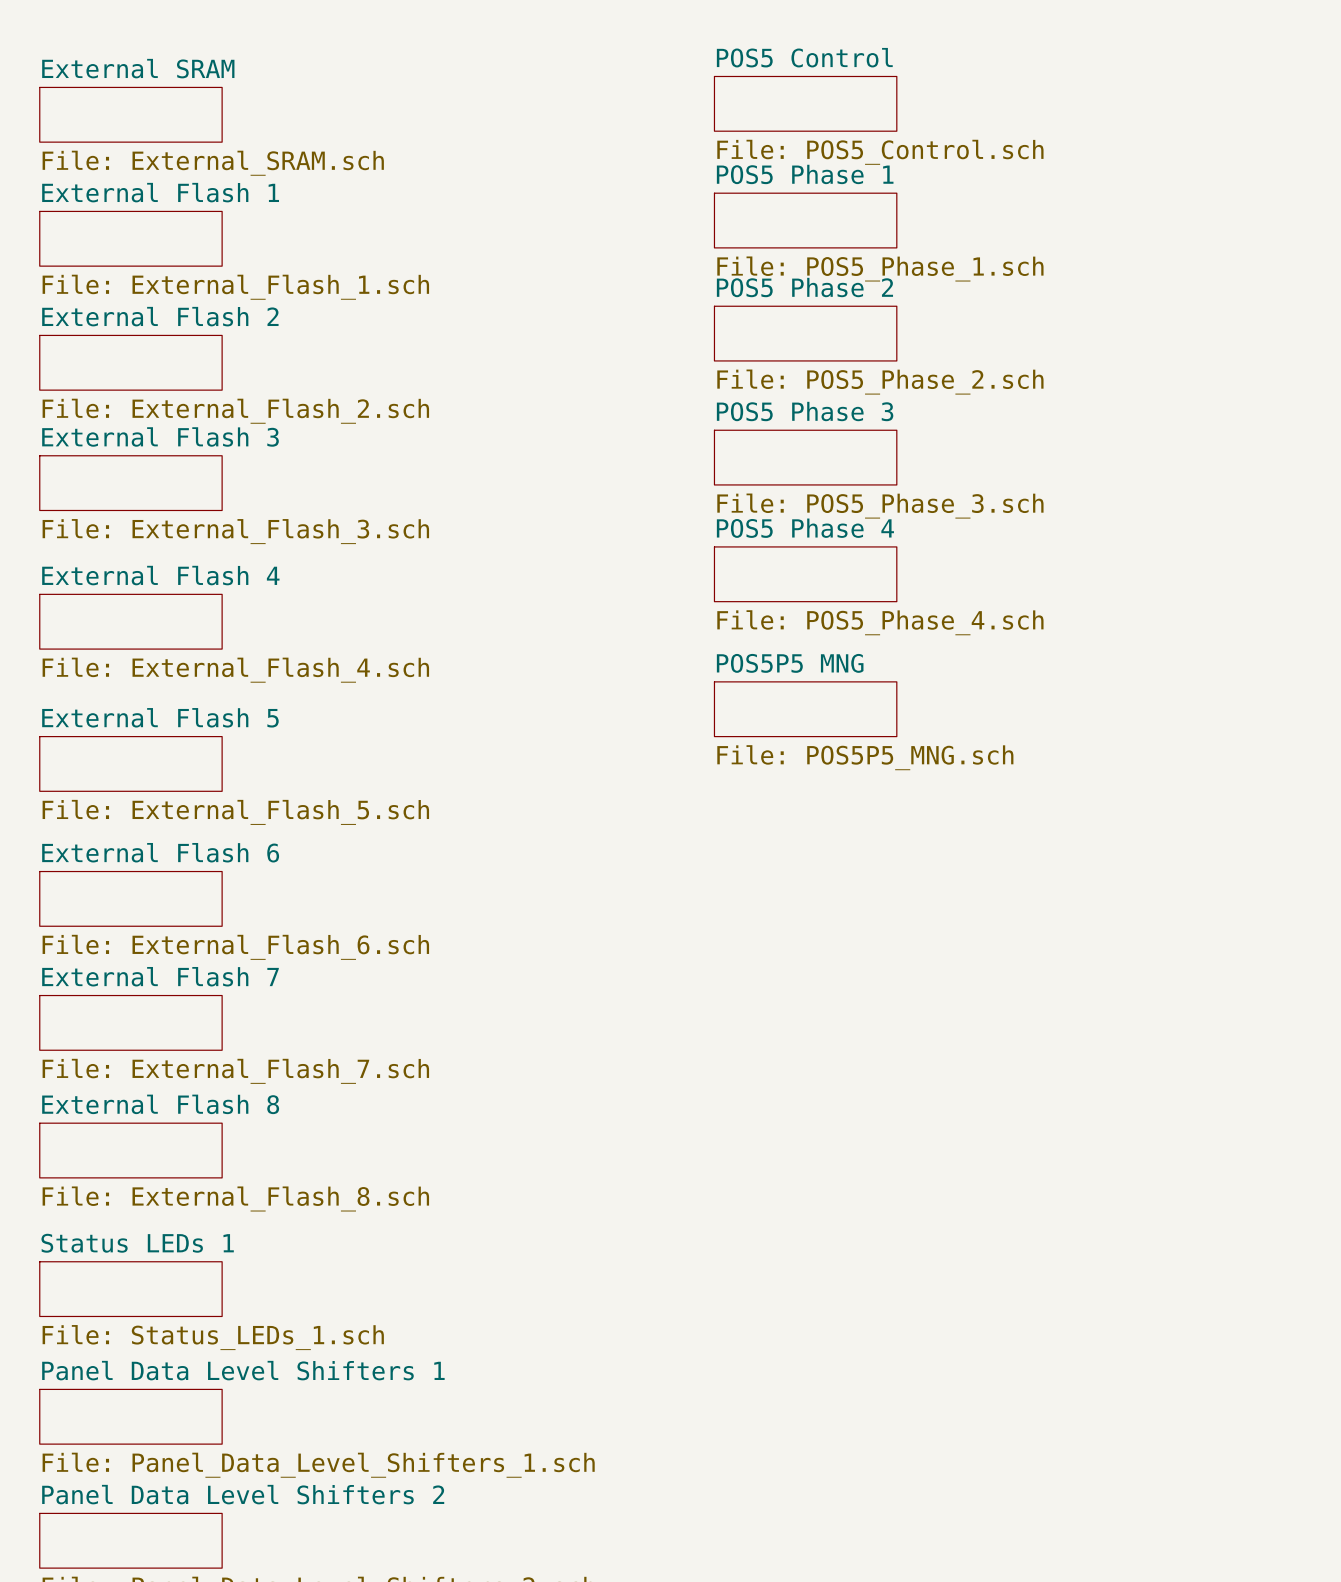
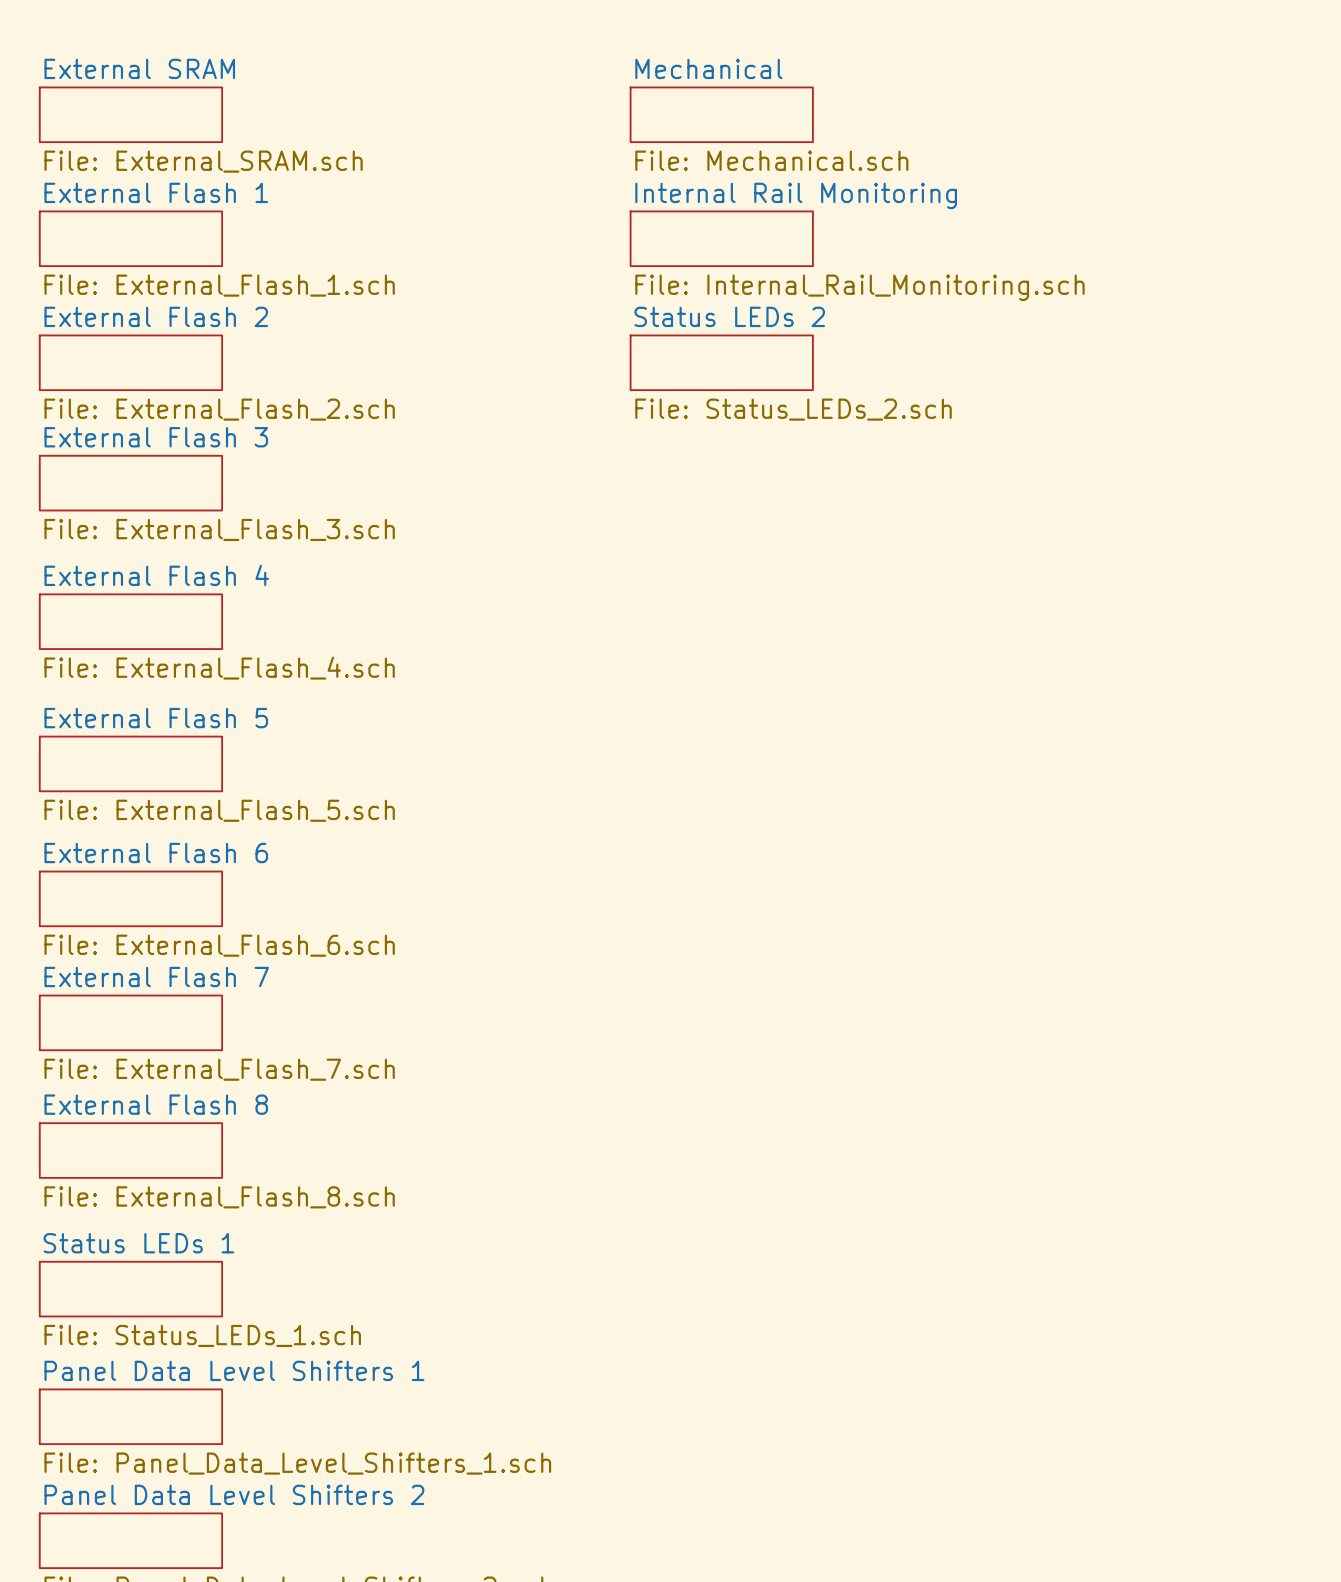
sheet POS5 Control: File: POS5_Control.sch (805, 103) -> none
sheet Mechanical: none -> File: Mechanical.sch (721, 114)
sheet POS5 Phase 1: File: POS5_Phase_1.sch (805, 220) -> none
sheet Internal Rail Monitoring: none -> File: Internal_Rail_Monitoring.sch (721, 238)
sheet POS5 Phase 2: File: POS5_Phase_2.sch (805, 333) -> none
sheet Status LEDs 2: none -> File: Status_LEDs_2.sch (721, 362)
sheet POS5 Phase 3: File: POS5_Phase_3.sch (805, 457) -> none
sheet POS5 Phase 4: File: POS5_Phase_4.sch (805, 574) -> none
sheet POS5P5 MNG: File: POS5P5_MNG.sch (805, 709) -> none

